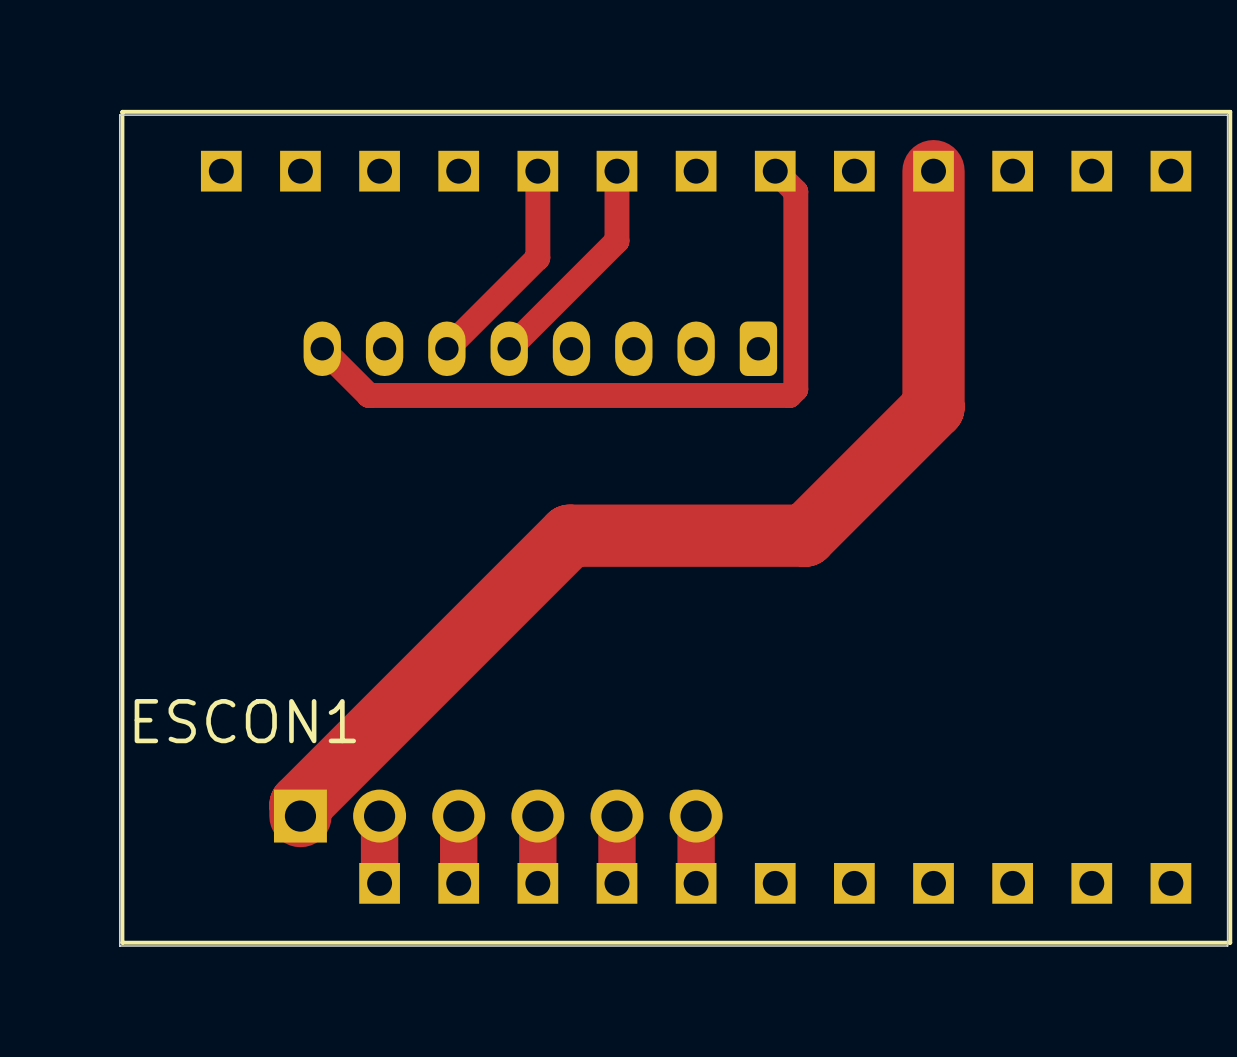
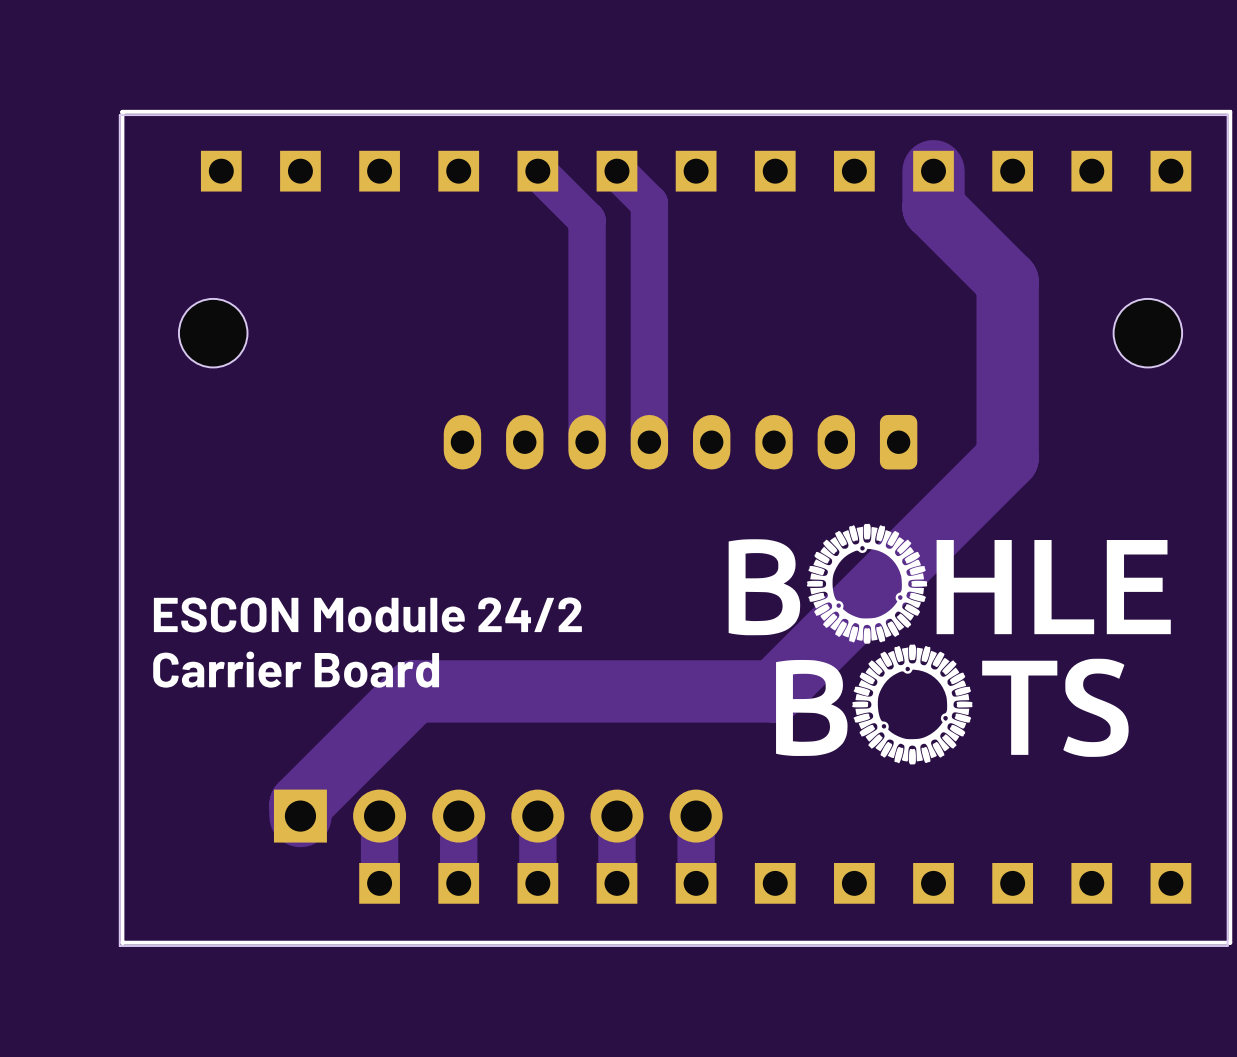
track: (537, 171) (537, 257) (446, 348) -> (537, 171) (587, 220) (587, 442)
track: (616, 171) (616, 240) (509, 348) -> (616, 171) (649, 203) (649, 442)
track: (775, 171) (795, 191) (795, 389) (789, 395) (368, 395) (322, 348) -> none
track: (933, 207) (933, 407) (805, 535) (569, 535) (413, 691) -> (933, 207) (1007, 281) (1007, 457) (774, 691) (413, 691)
part: none -> (213, 333)
part: none -> (1147, 333)
part position: (540, 348) -> (680, 442)
drawing: none -> [728, 523, 1171, 765]
text: none -> ESCON Module 24/2 (367, 615)
text: none -> Carrier Board (296, 669)
ESCON1 name: ESCON1 (245, 721) -> none

